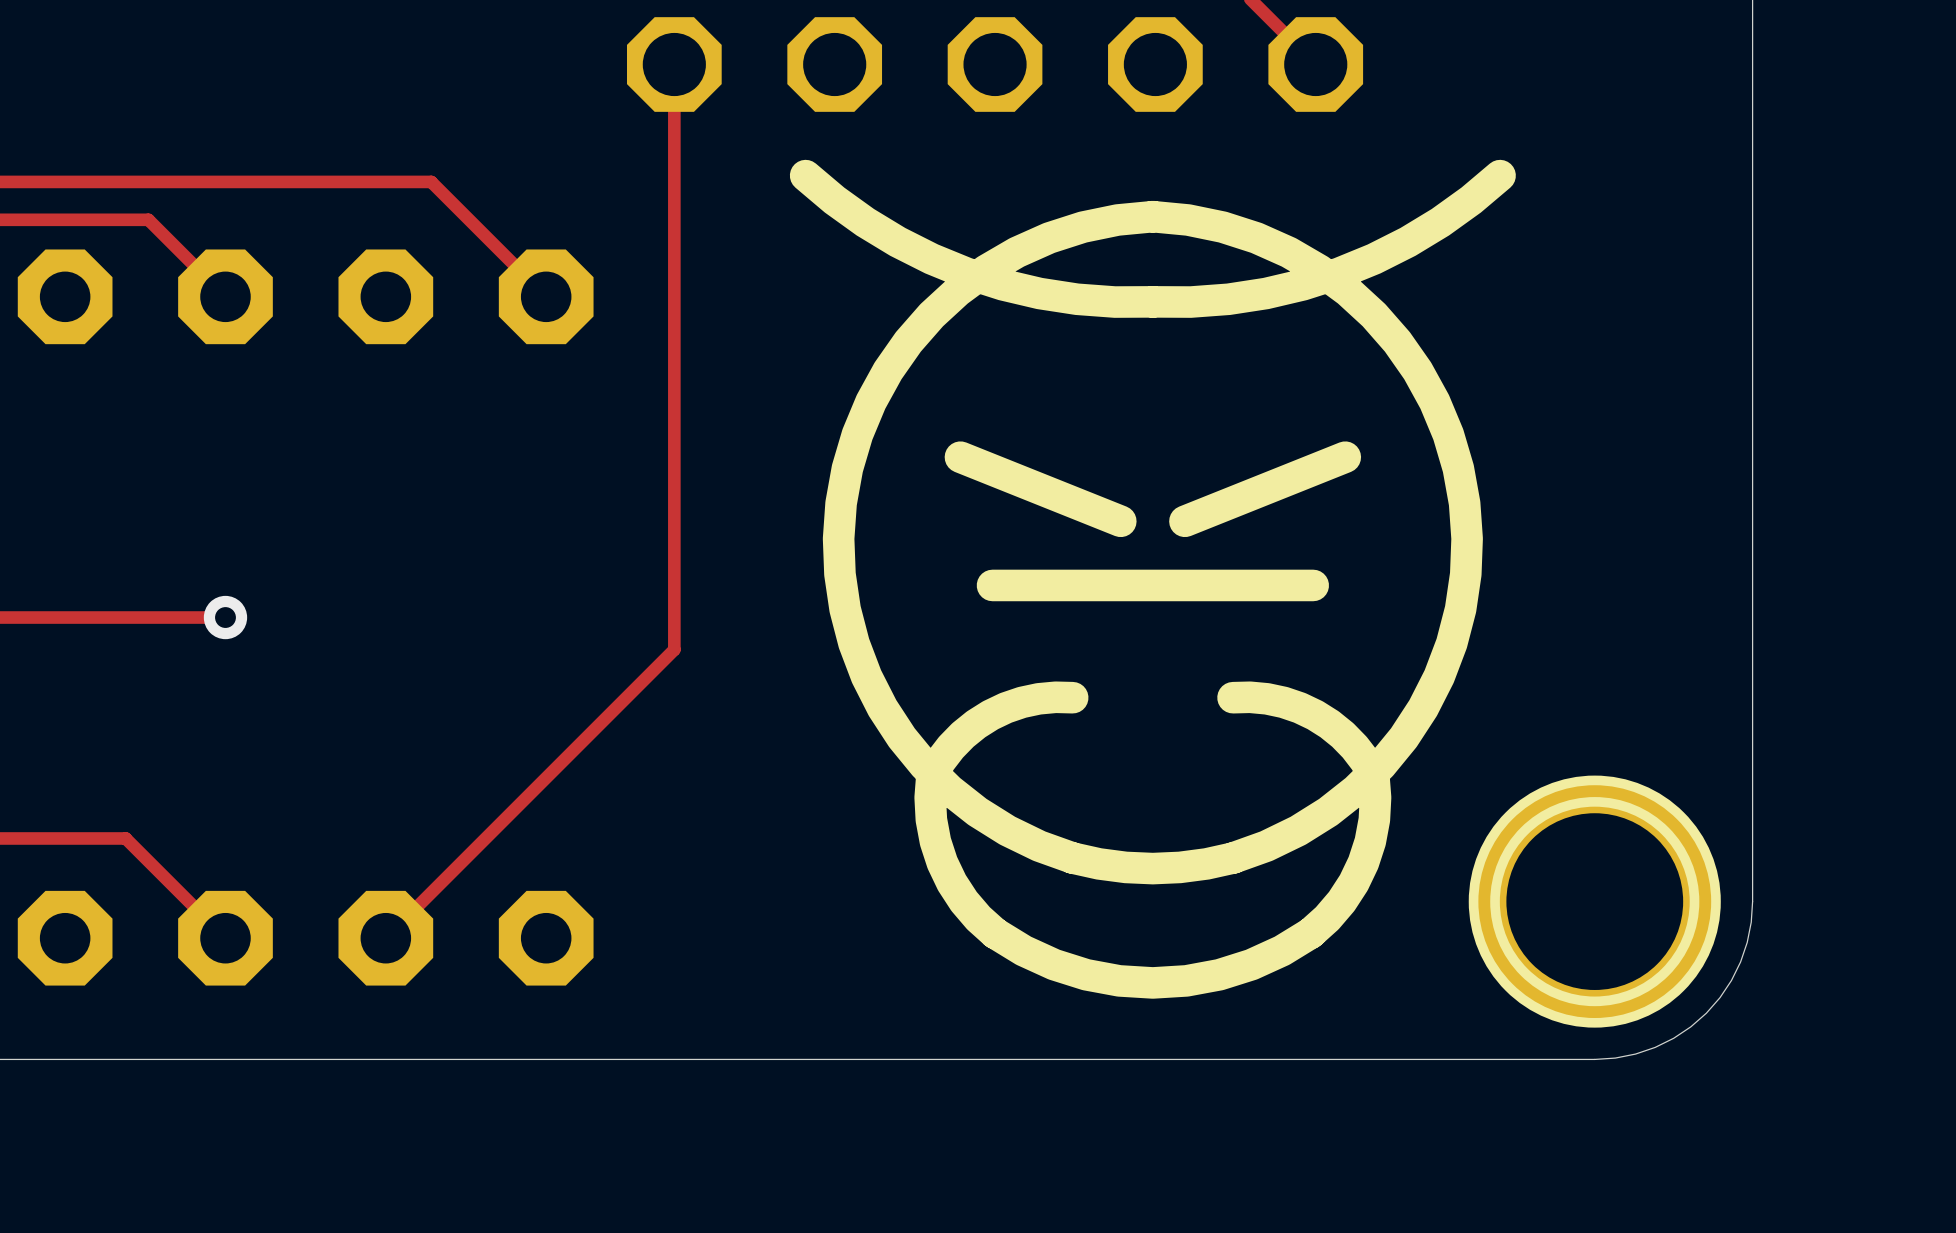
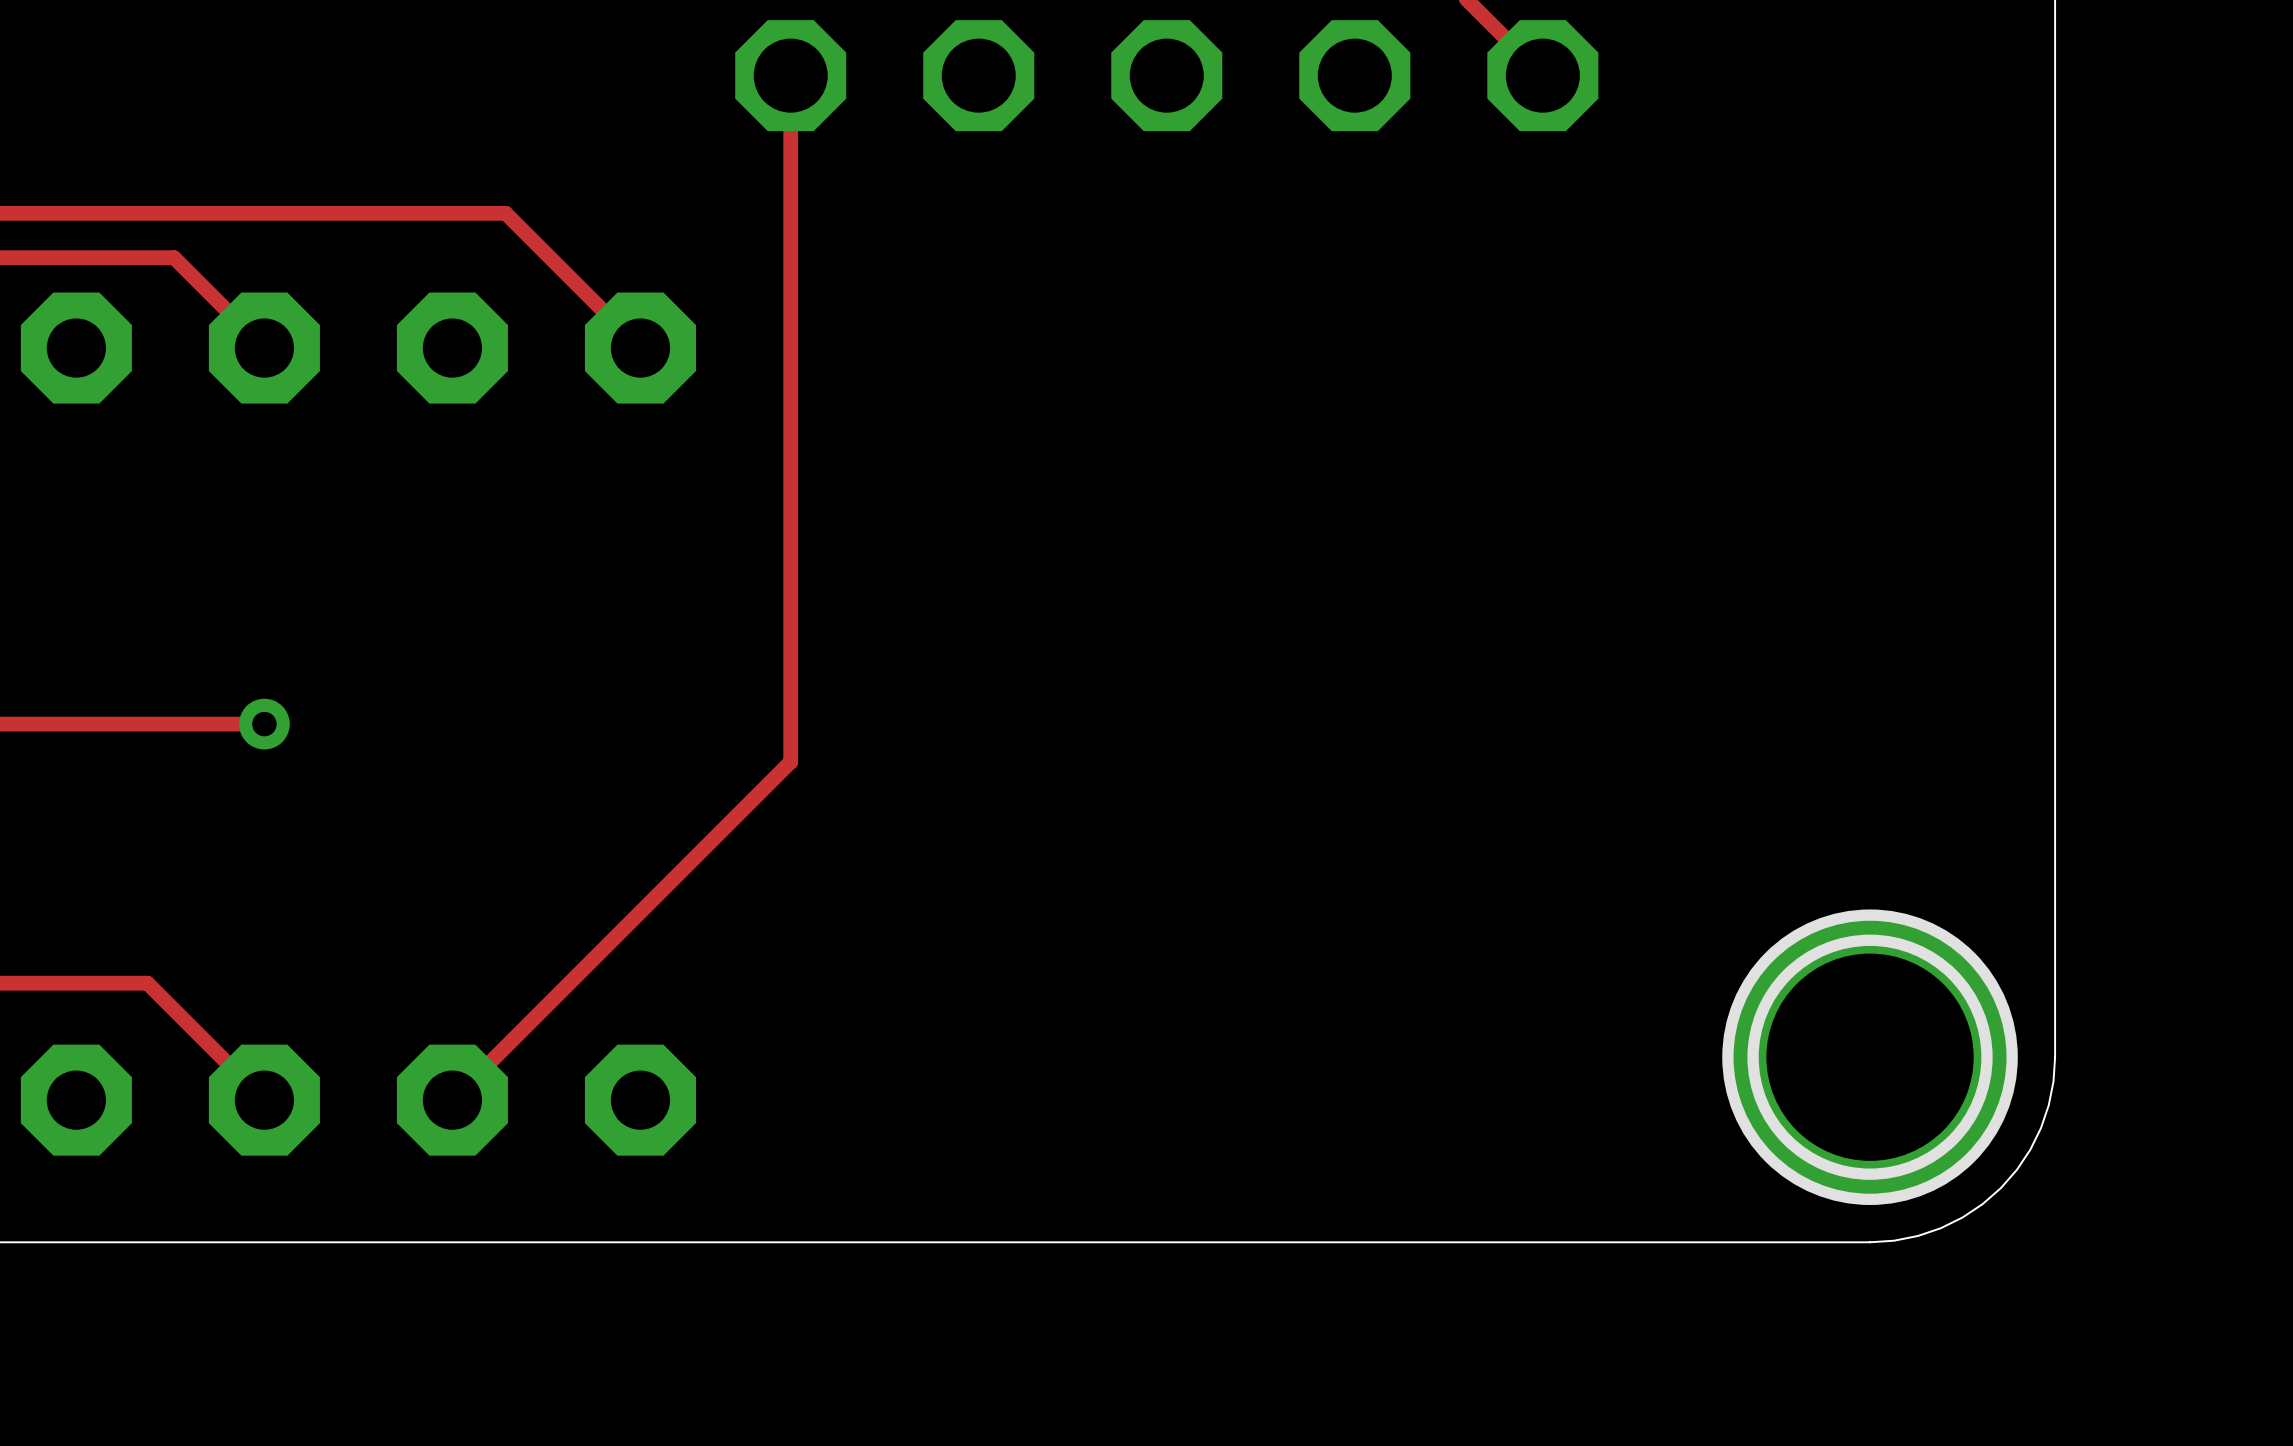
drawing: [789, 159, 1516, 999] -> none

